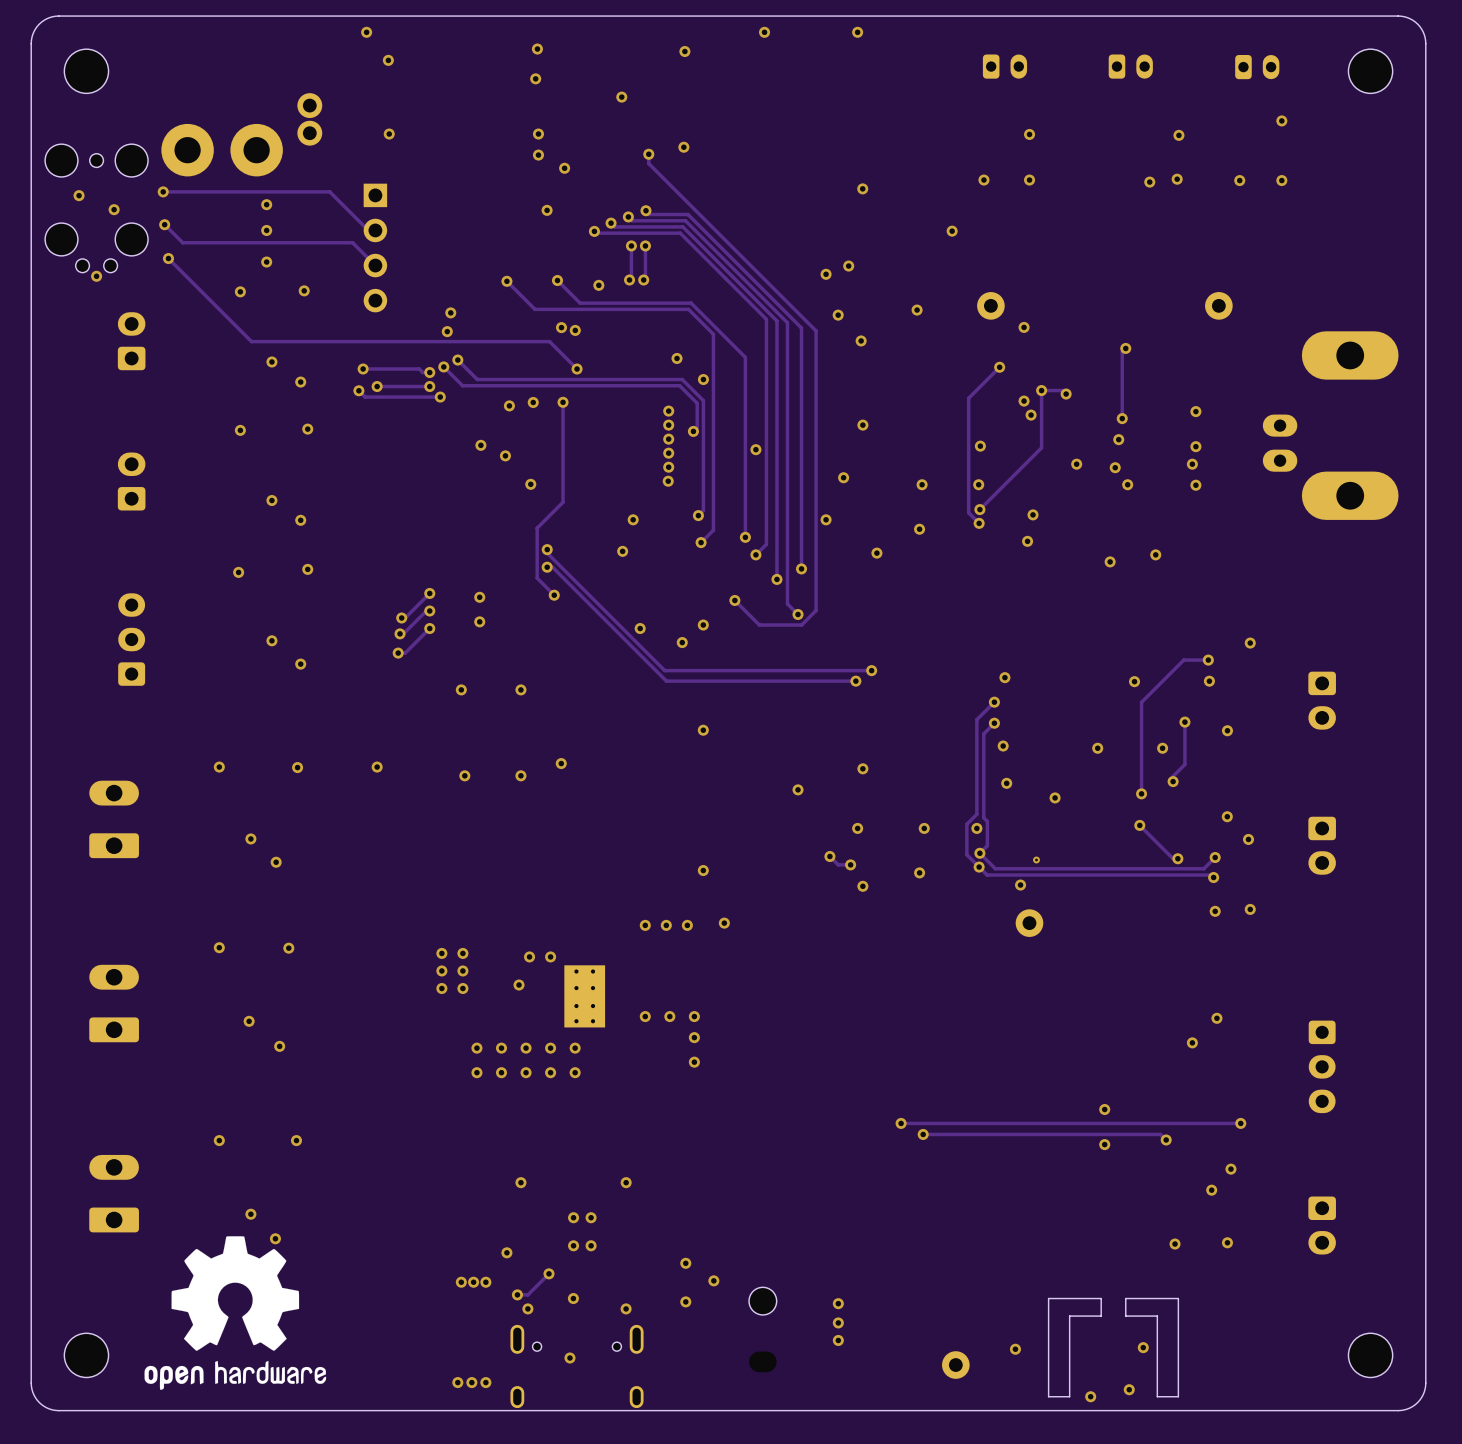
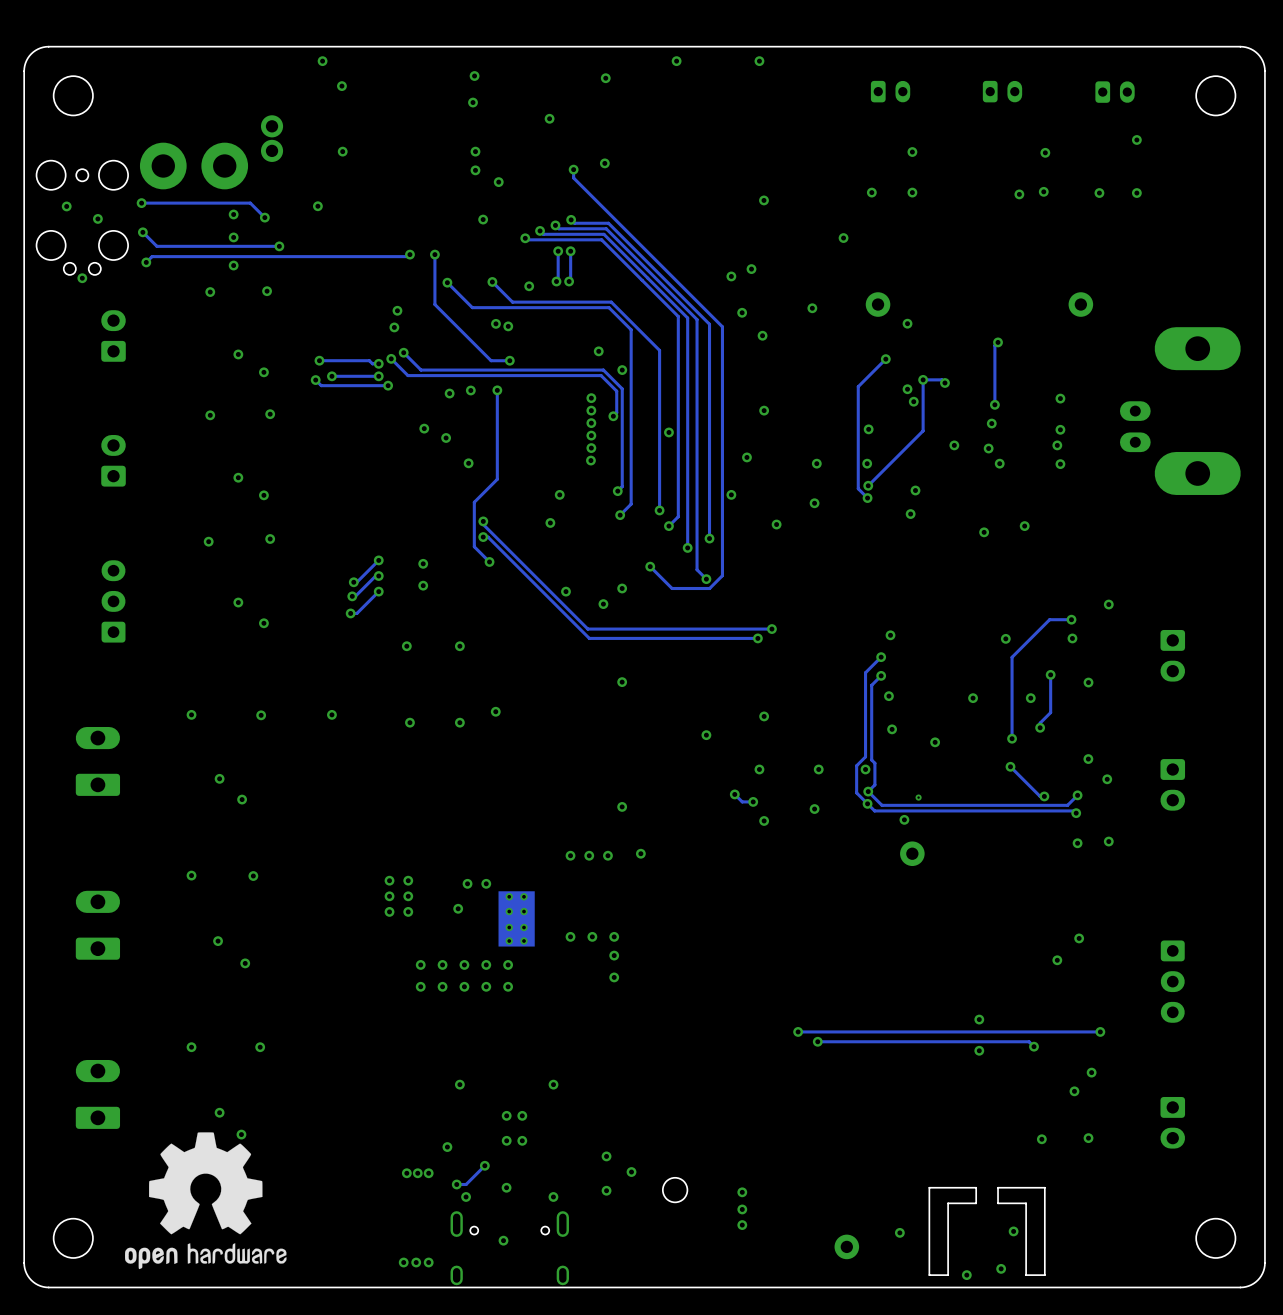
track: (285, 191) (329, 191) (368, 230) (375, 230) -> (250, 203) (264, 217)
via: none -> (317, 206)
via: none -> (264, 217)
track: (180, 240) (182, 242) (352, 242) (375, 265) -> (156, 246) (279, 246)
via: none -> (279, 246)
part: (375, 248) -> none
via: none -> (409, 254)
track: none -> (434, 254) (434, 304) (491, 360) (509, 360)
via: none -> (434, 254)
track: (168, 258) (251, 341) (549, 341) (577, 369) -> (146, 262) (152, 256) (407, 256) (409, 254)

